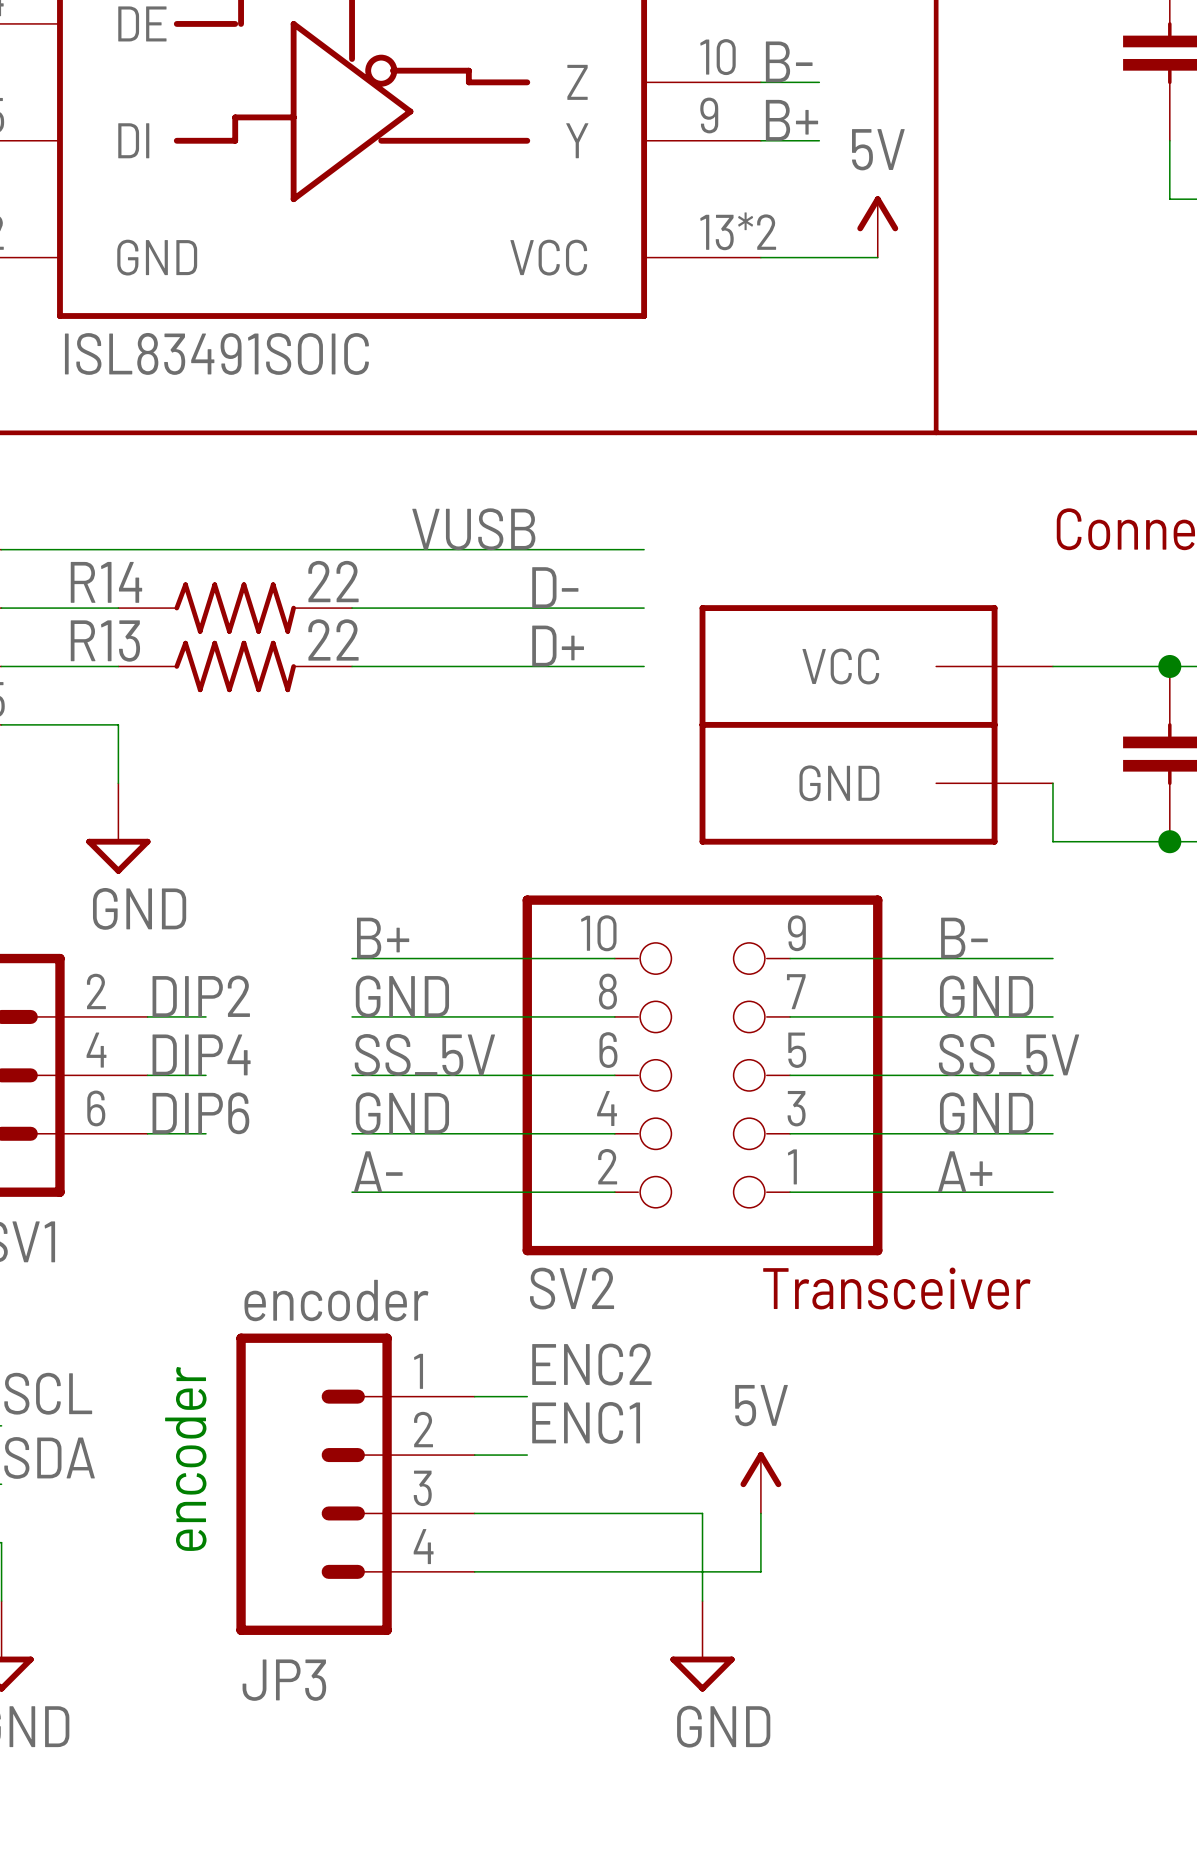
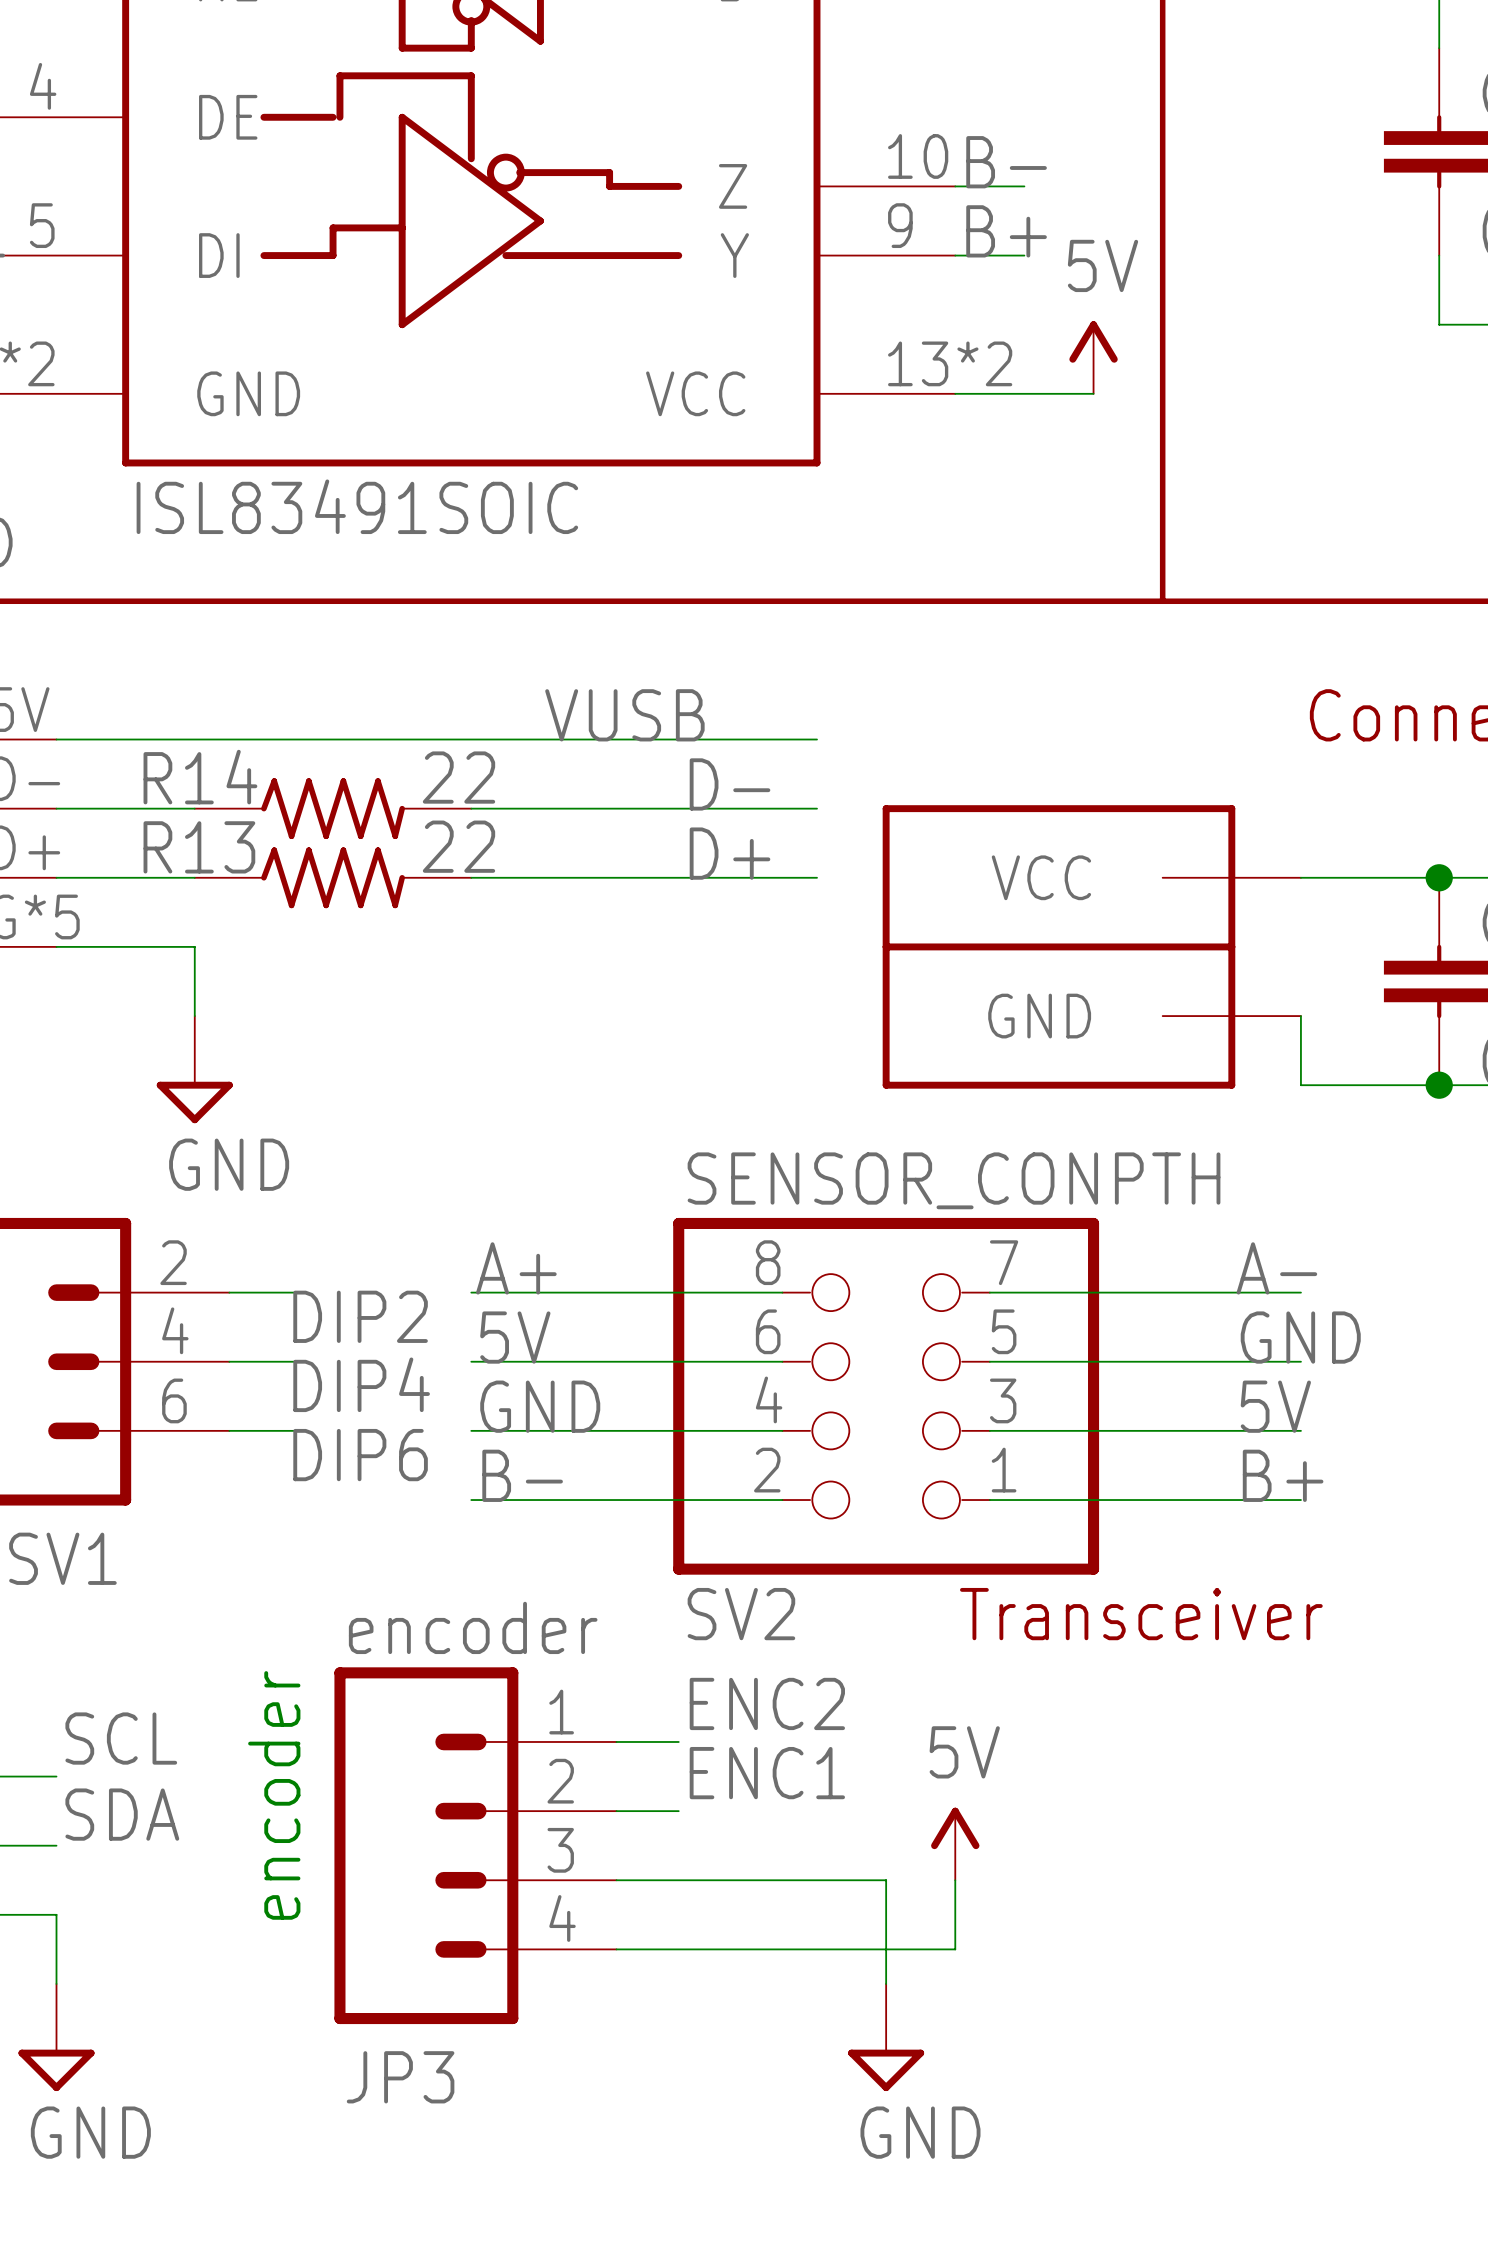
SV2 symbol: [522, 895, 883, 1256] -> [673, 1217, 1100, 1575]
SV2 value: none -> SENSOR_CONPTH (954, 1180)
label: B+ (383, 938) -> none
label: B- (964, 938) -> none
wire: (352, 958) (614, 958) -> none
wire: (790, 958) (1052, 958) -> none
label position: DIP2 (201, 996) -> DIP2 (360, 1316)
label: GND (402, 996) -> A+ (516, 1268)
label: GND (986, 996) -> none
label: none -> A- (1276, 1268)
label position: DIP4 (201, 1054) -> DIP4 (361, 1384)
label: SS_5V (424, 1054) -> 5V (515, 1337)
label: SS_5V (1009, 1054) -> none
label: none -> GND (1300, 1337)
label position: DIP6 (200, 1113) -> DIP6 (360, 1455)
label: GND (986, 1113) -> none
label: none -> 5V (1275, 1406)
label: A- (378, 1171) -> B- (522, 1475)
label: A+ (965, 1171) -> none
label: none -> B+ (1283, 1475)

